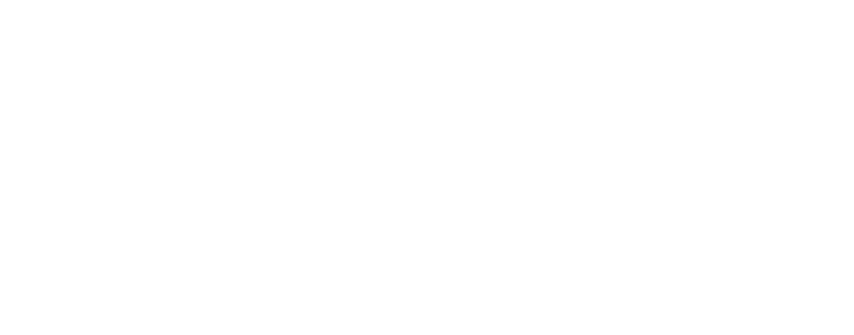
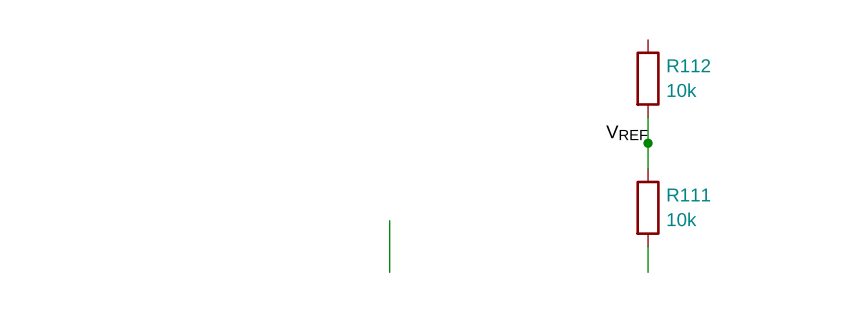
R112: none -> 10k (648, 78)
wire: none -> (648, 117) (648, 169)
label: none -> VREF (626, 132)
junction: none -> (648, 143)
R111: none -> 10k (648, 207)
wire: none -> (389, 220) (389, 272)
wire: none -> (648, 246) (648, 272)

